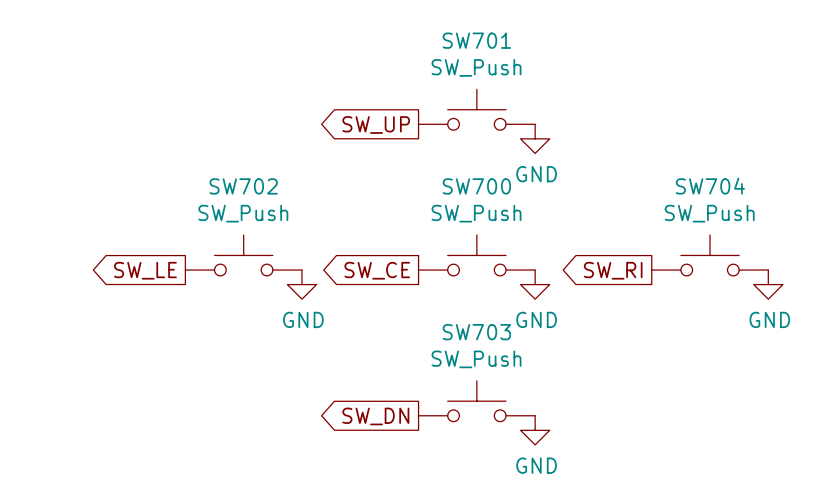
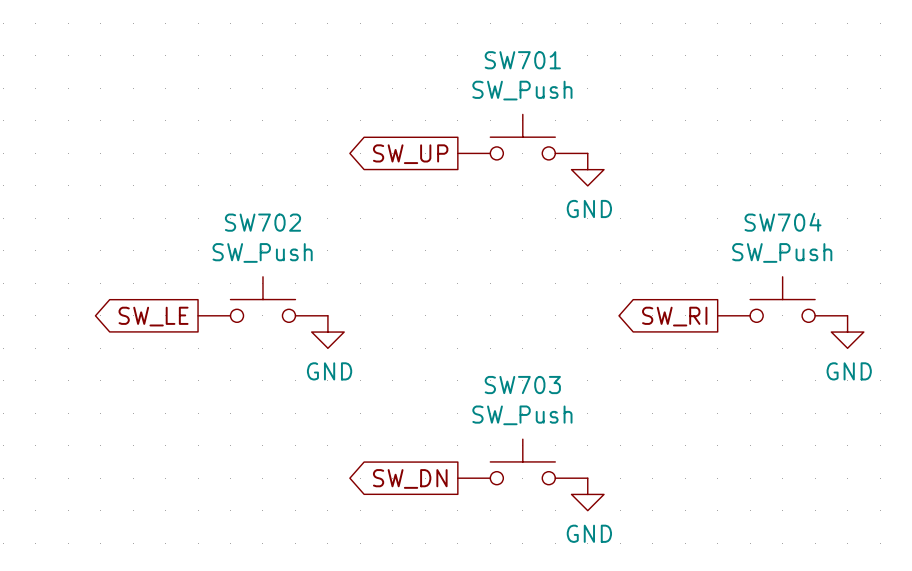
SW700: SW_Push (476, 255) -> none
global label: SW_CE (377, 270) -> none
power symbol: GND (535, 284) -> none

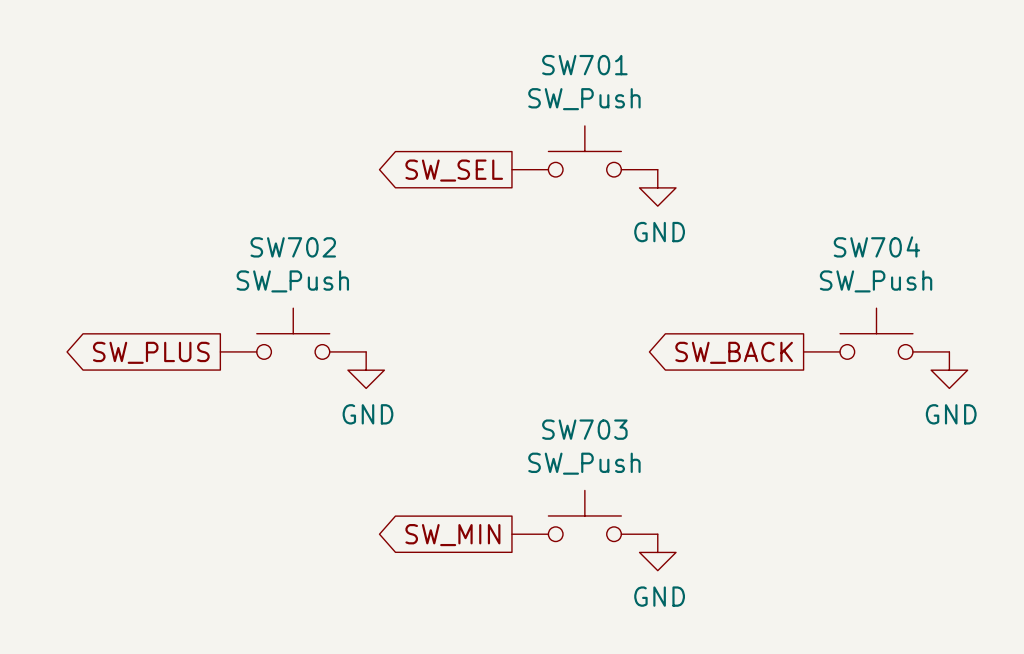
global label: SW_UP (410, 154) -> SW_SEL (454, 170)
global label: SW_LE (153, 316) -> SW_PLUS (151, 352)
global label: SW_RI (674, 316) -> SW_BACK (734, 352)
global label: SW_DN (410, 478) -> SW_MIN (452, 535)

